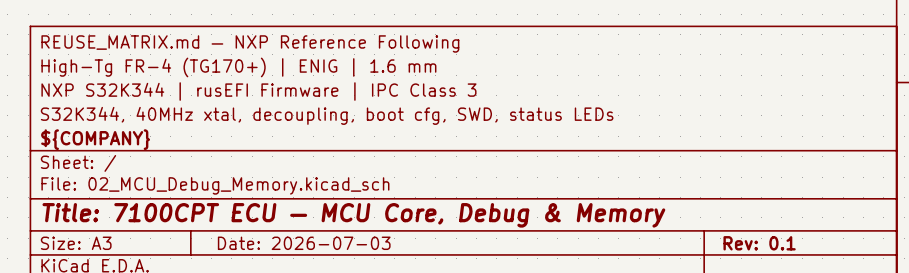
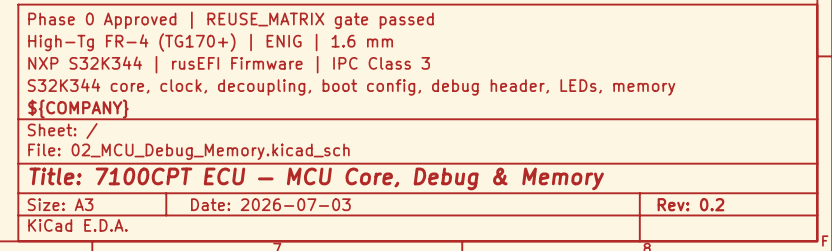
title block: REUSE_MATRIX.md — NXP Reference Following (250, 43) -> Phase 0 Approved | REUSE_MATRIX gate passed (230, 20)
title block: S32K344, 40MHz xtal, decoupling, boot cfg, SWD, status LEDs (327, 115) -> S32K344 core, clock, decoupling, boot config, debug header, LEDs, memory (351, 87)
title block: Rev: 0.1 (759, 243) -> Rev: 0.2 (690, 204)

